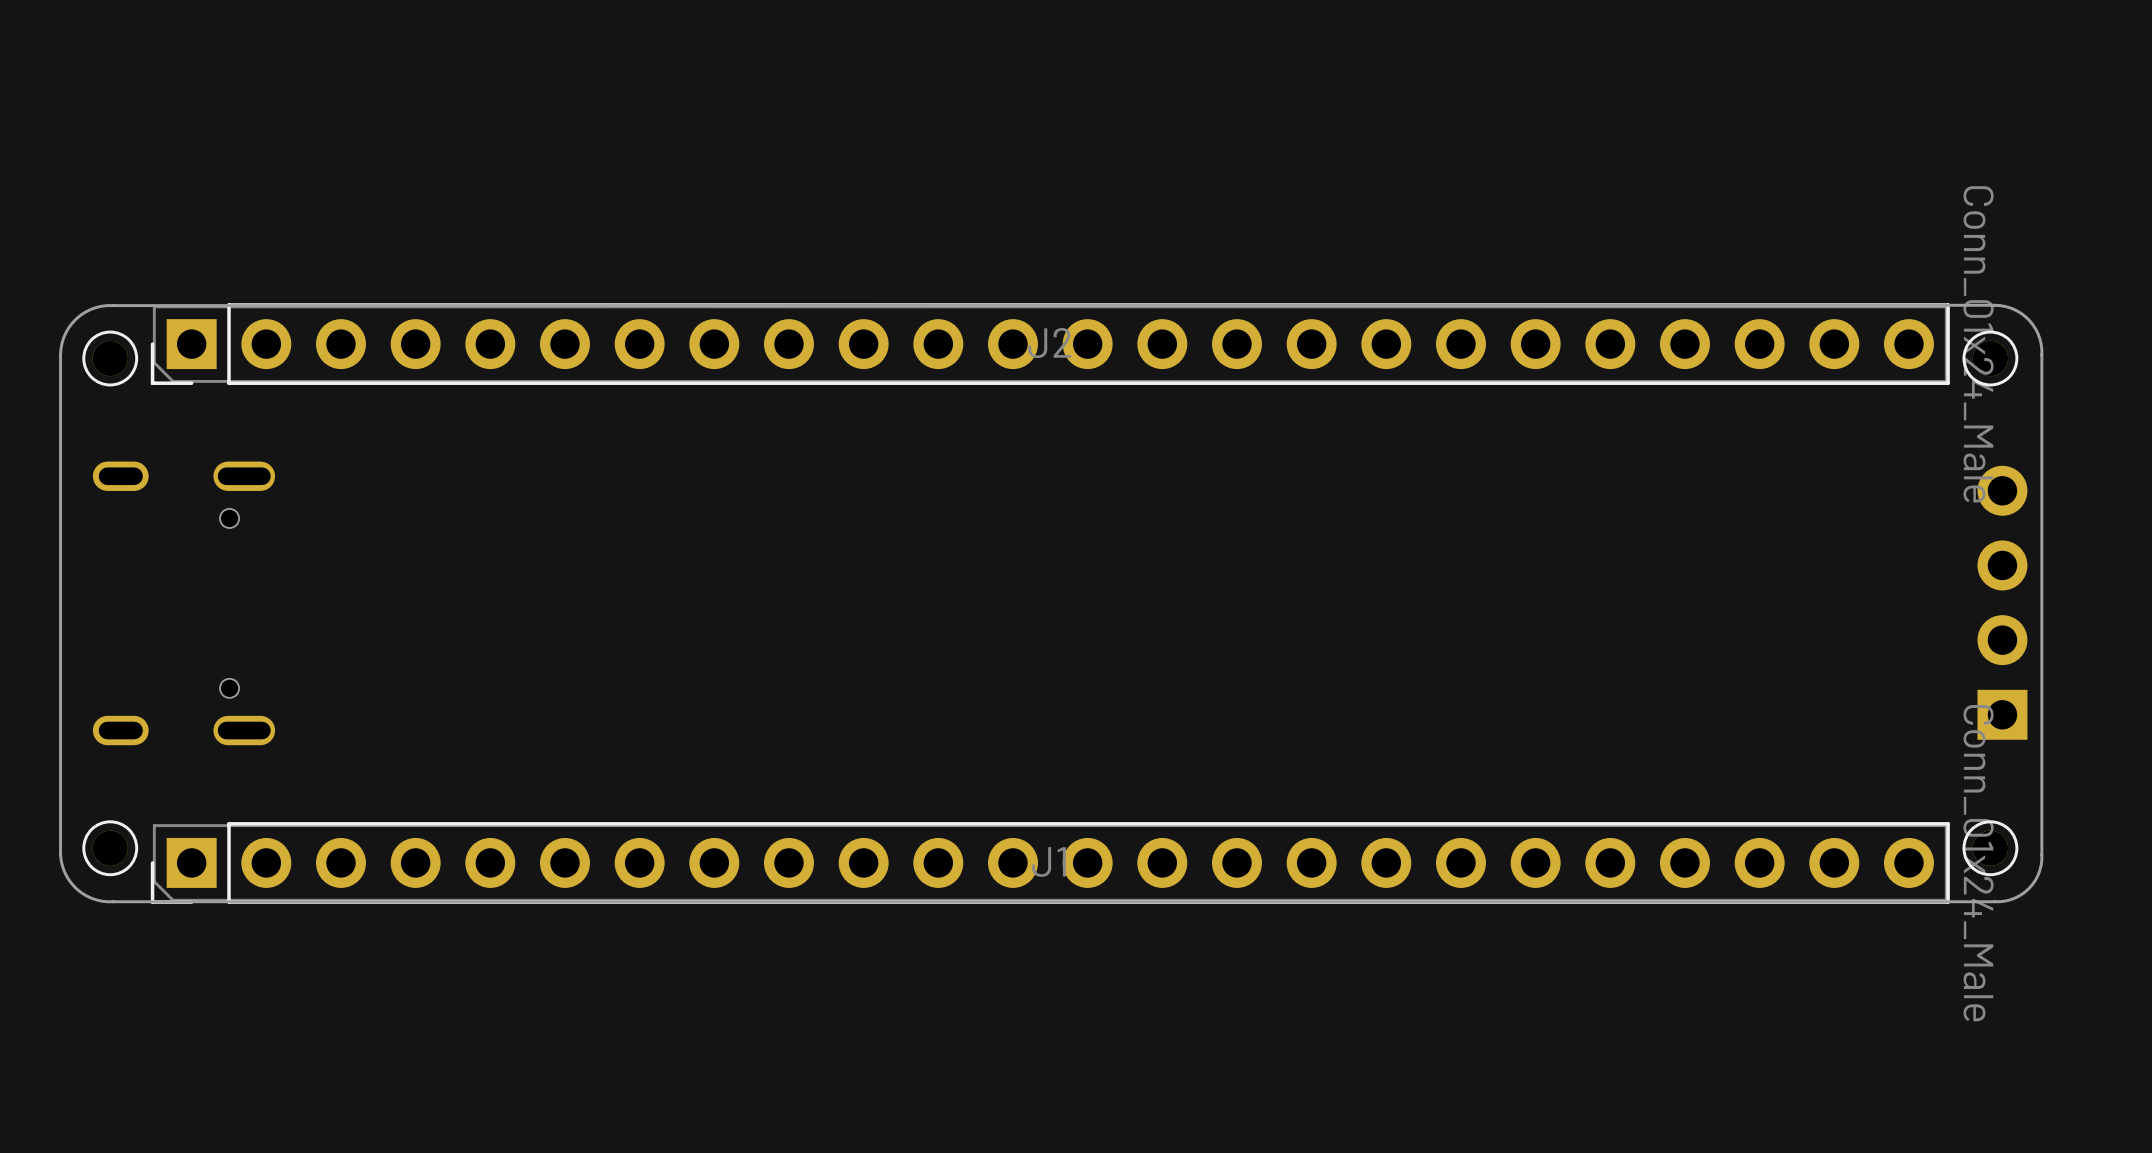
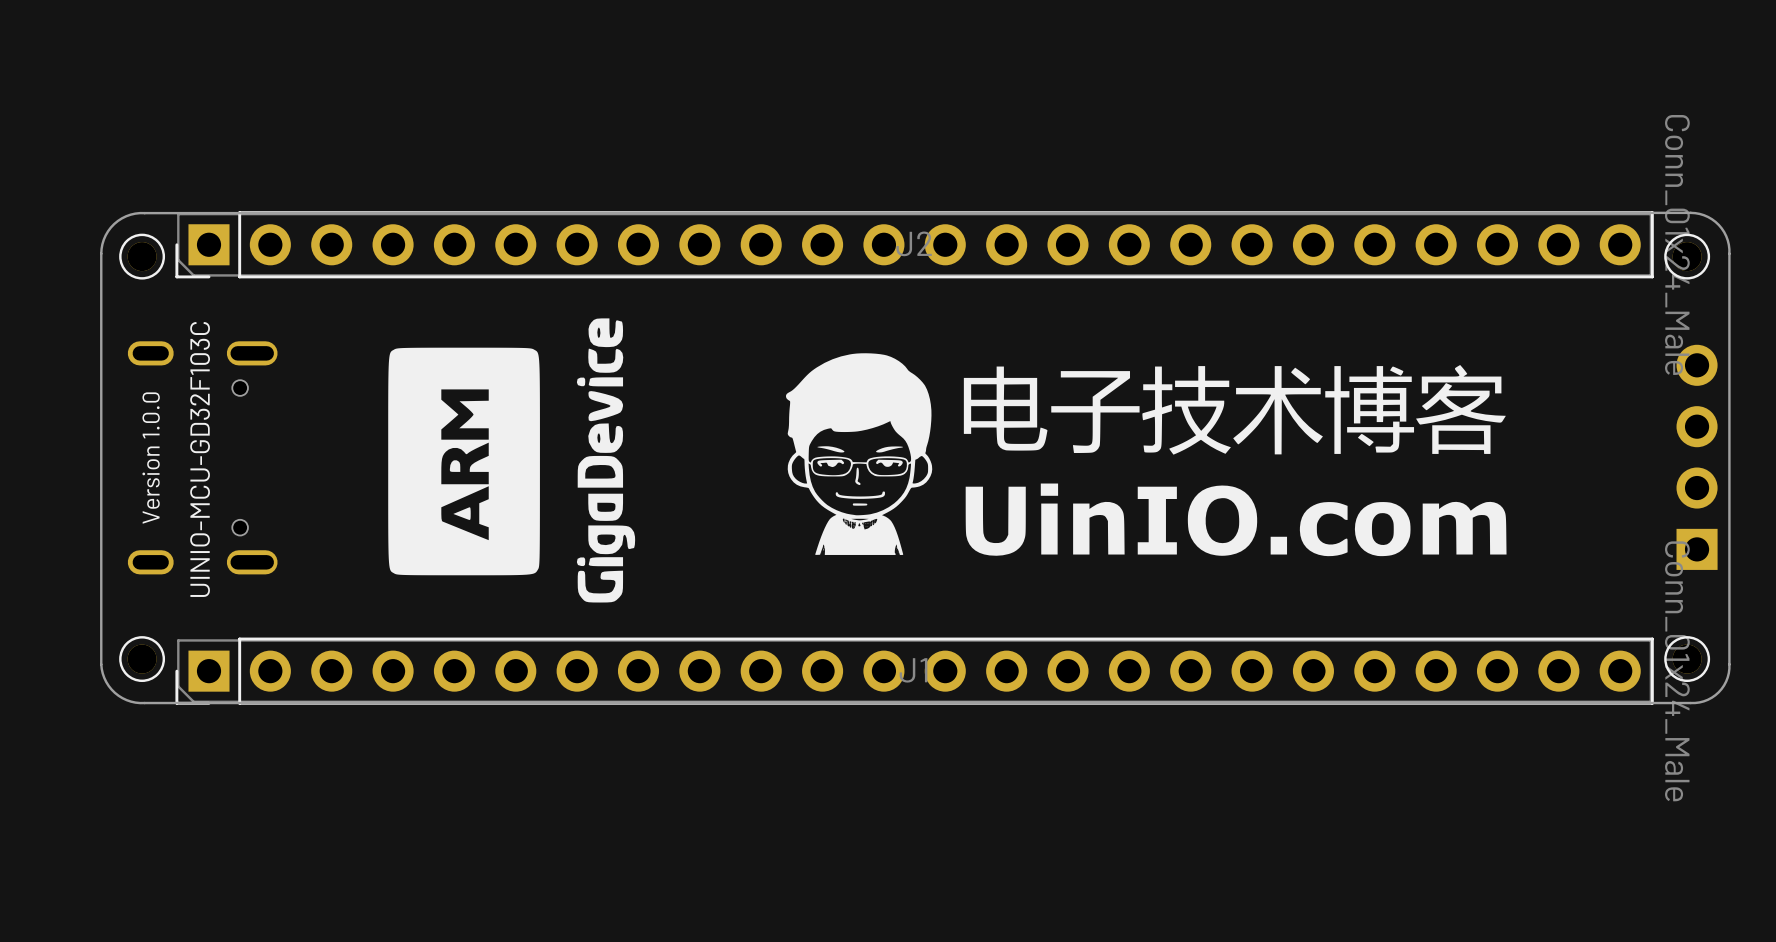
drawing: none -> [576, 318, 636, 603]
drawing: none -> [388, 347, 540, 576]
drawing: none -> [786, 353, 1507, 557]
text: none -> Version 1.0.0 (151, 458)
text: none -> UINIO-MCU-GD32F103C (200, 459)

